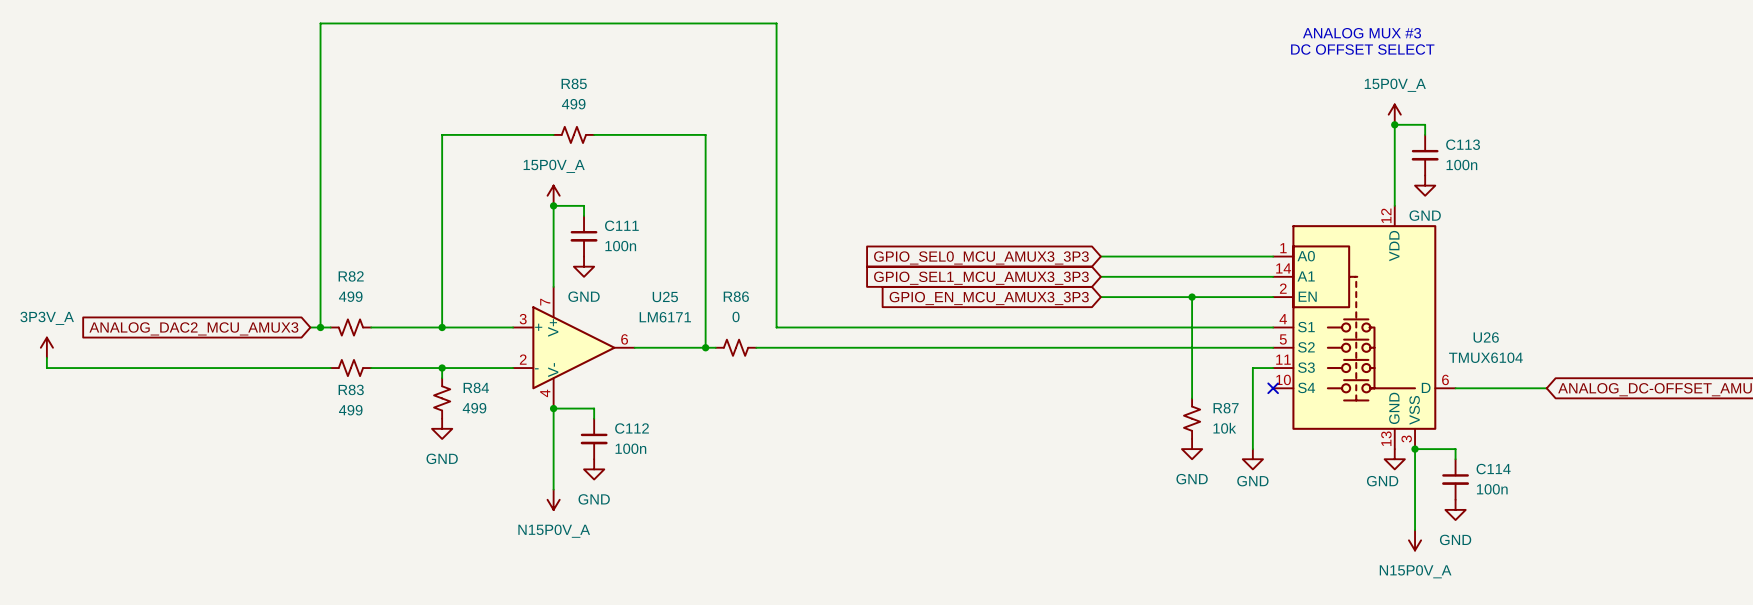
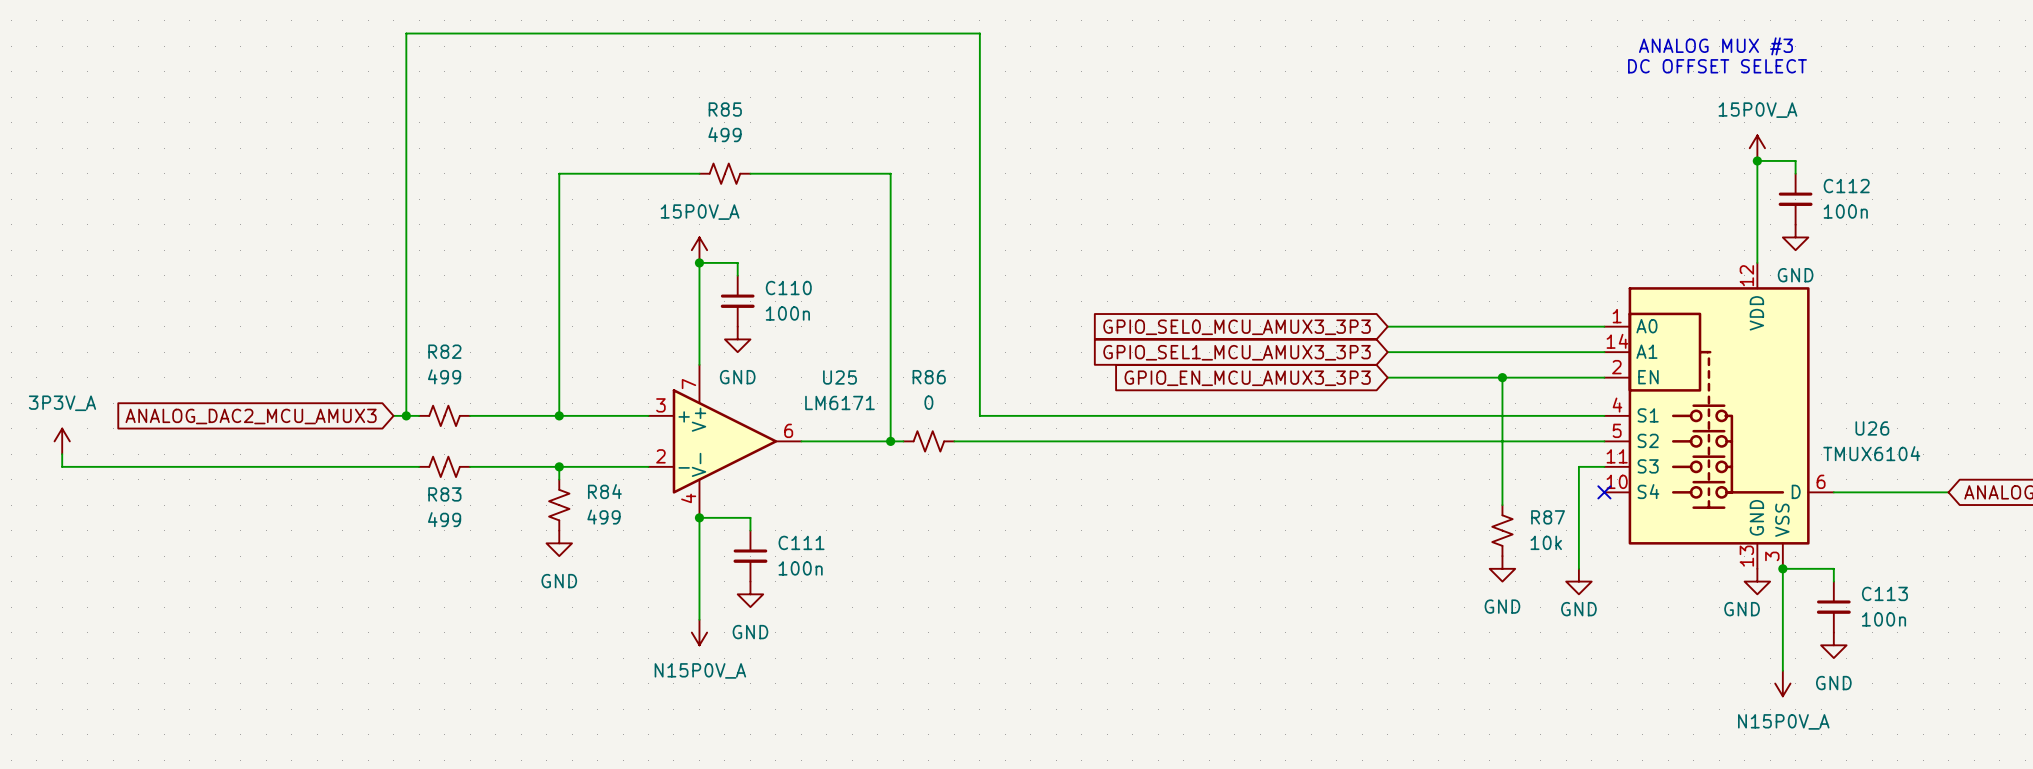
C113 name: C113 (1463, 144) -> C112 (1846, 186)
C111 name: C111 (621, 225) -> C110 (788, 288)
R82 flip: as is (350, 327) -> left-right (444, 415)
C112 name: C112 (632, 428) -> C111 (801, 542)
C114 name: C114 (1493, 469) -> C113 (1884, 593)

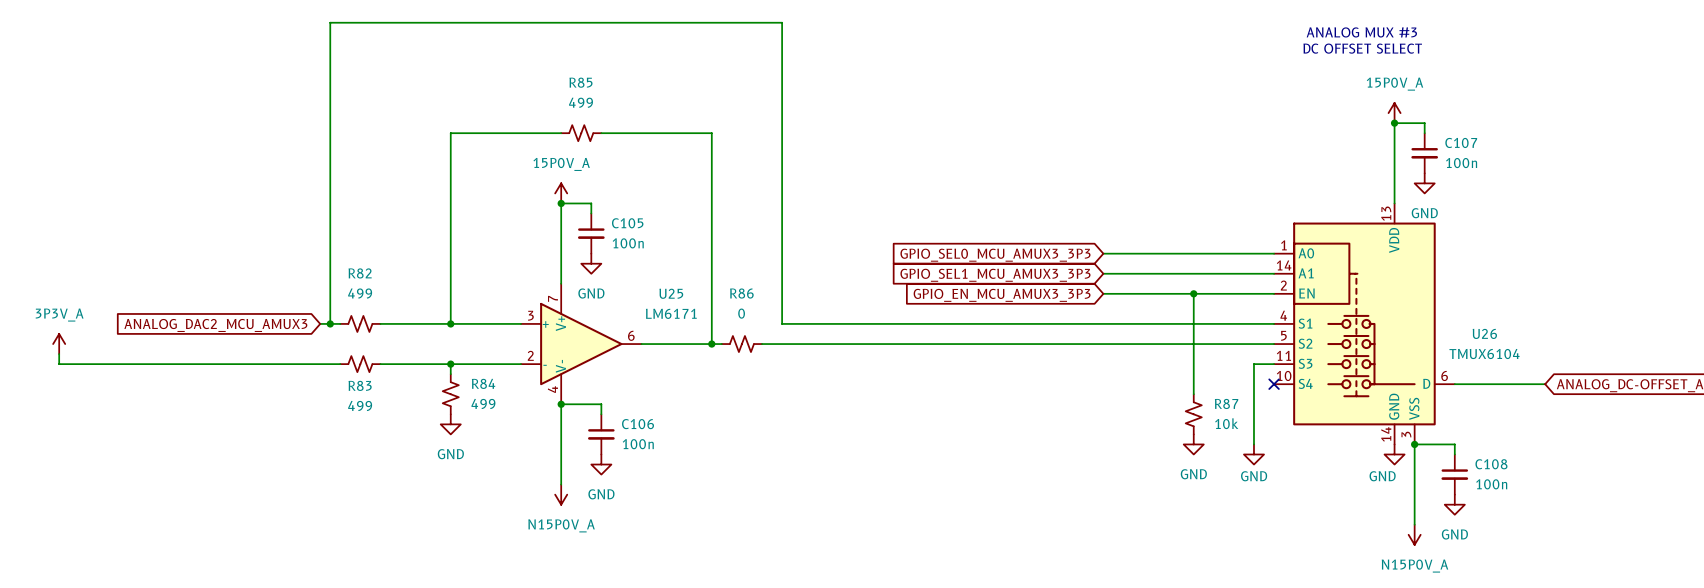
C112 name: C112 (1846, 186) -> C107 (1461, 142)
U26 pin number: 12 (1746, 275) -> 13 (1386, 213)
C110 name: C110 (788, 288) -> C105 (627, 223)
C111 name: C111 (801, 542) -> C106 (638, 424)
U26 pin number: 13 (1746, 556) -> 14 (1386, 434)
C113 name: C113 (1884, 593) -> C108 (1491, 464)

